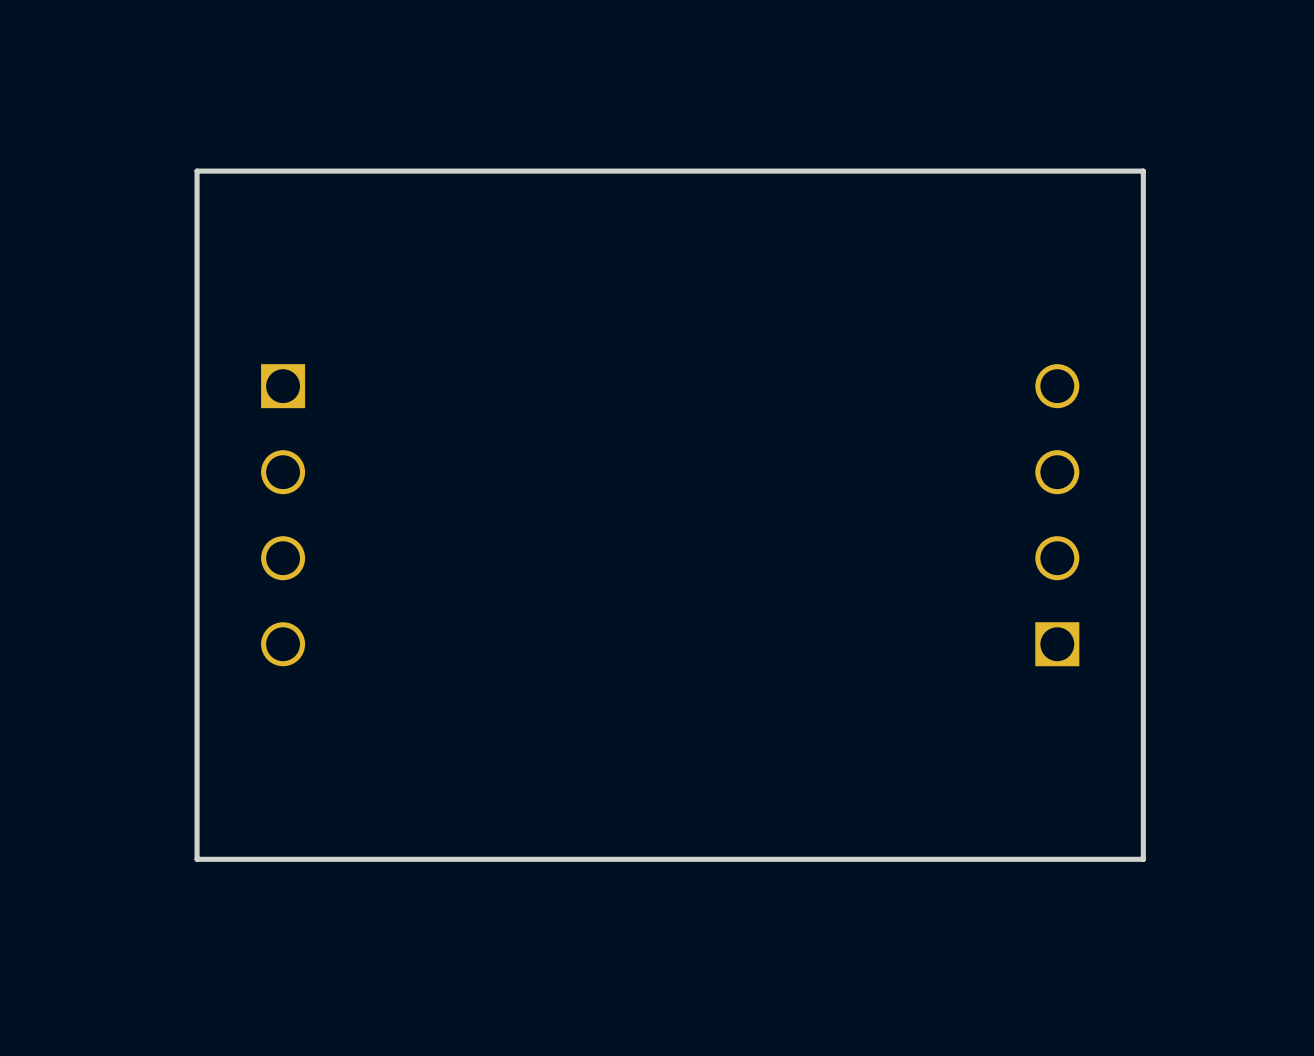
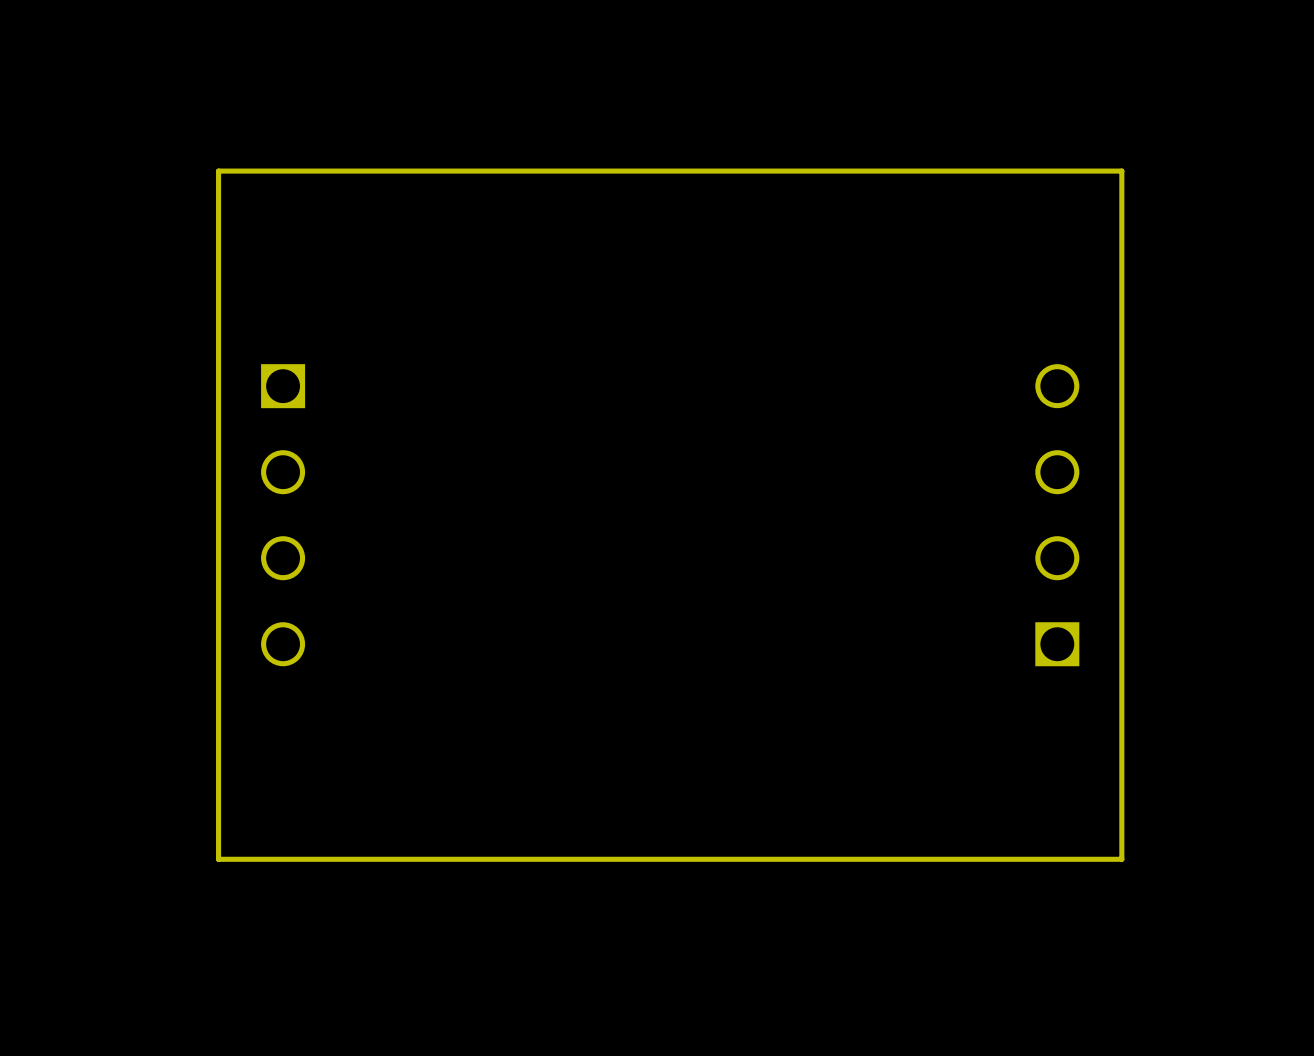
board edge: (218, 171) (197, 171) (197, 859) (218, 859) -> (218, 171) (218, 859)
board edge: (1121, 171) (1143, 171) (1143, 859) (1121, 859) -> (1121, 171) (1121, 859)

